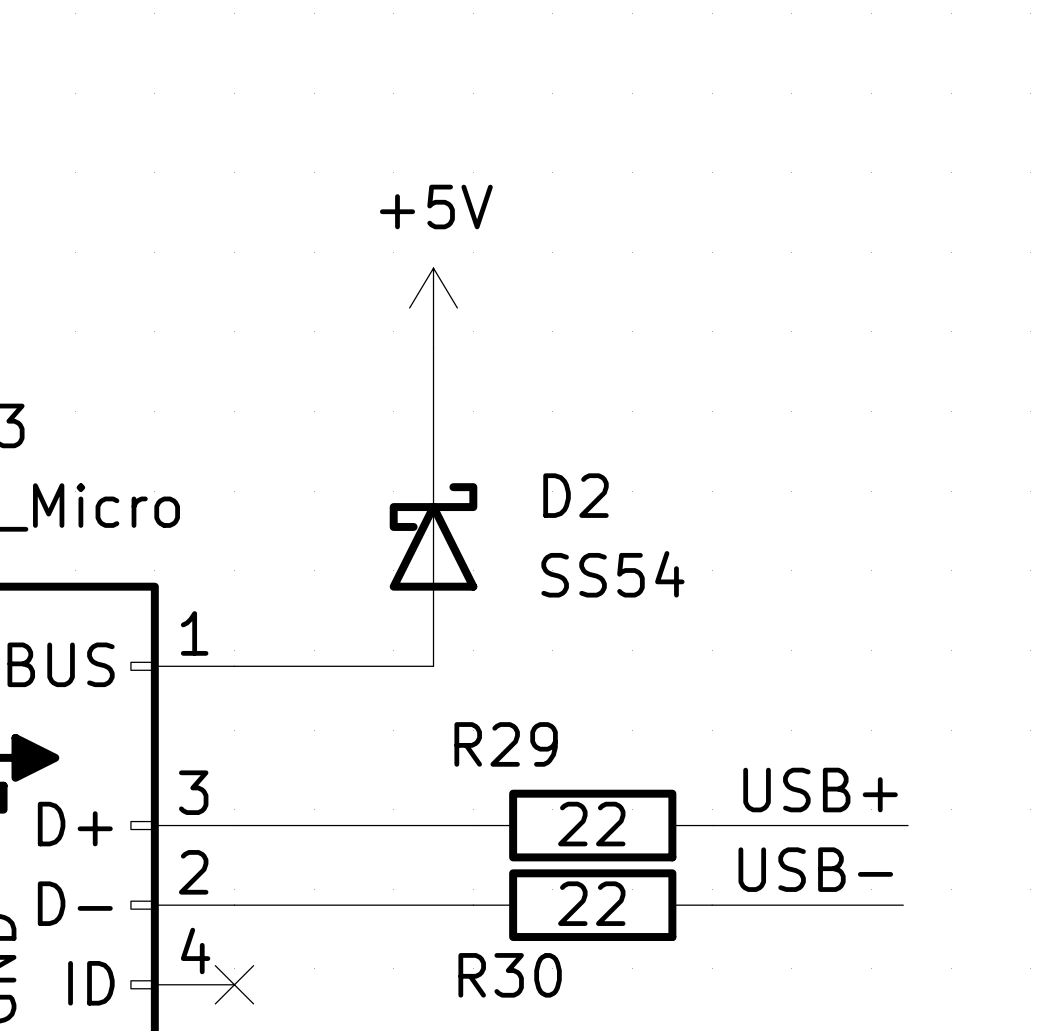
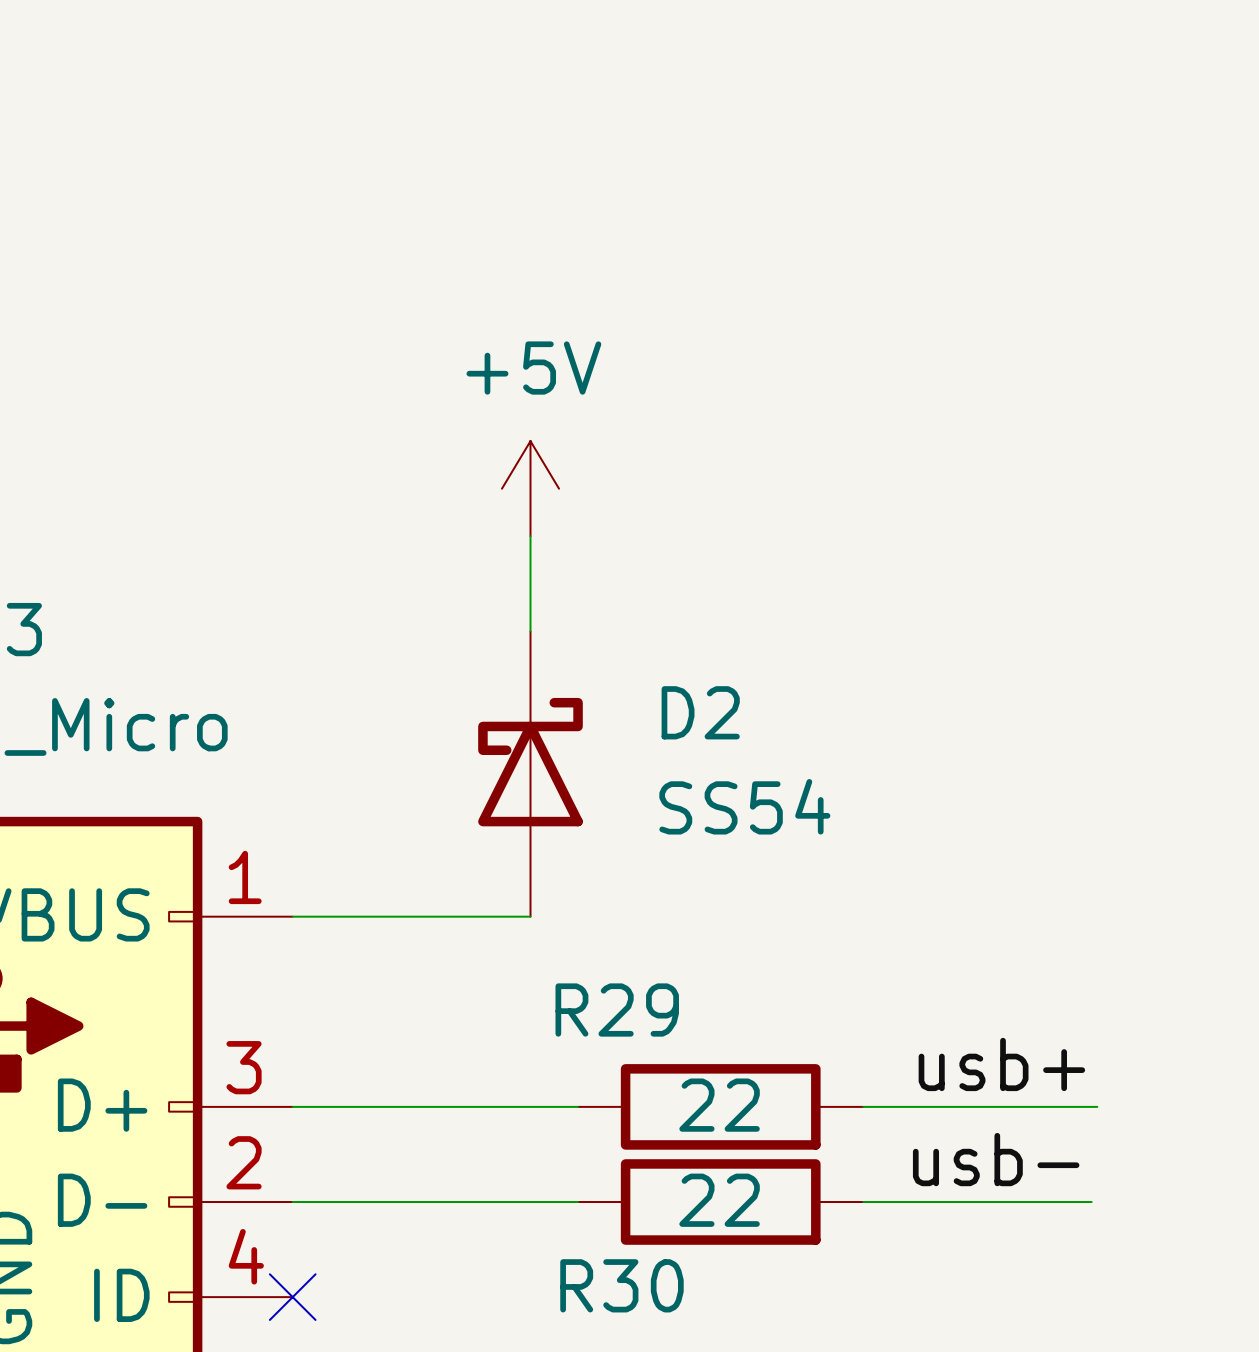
label: USB+ (820, 790) -> usb+ (1001, 1064)
label: USB- (815, 869) -> usb- (996, 1159)

